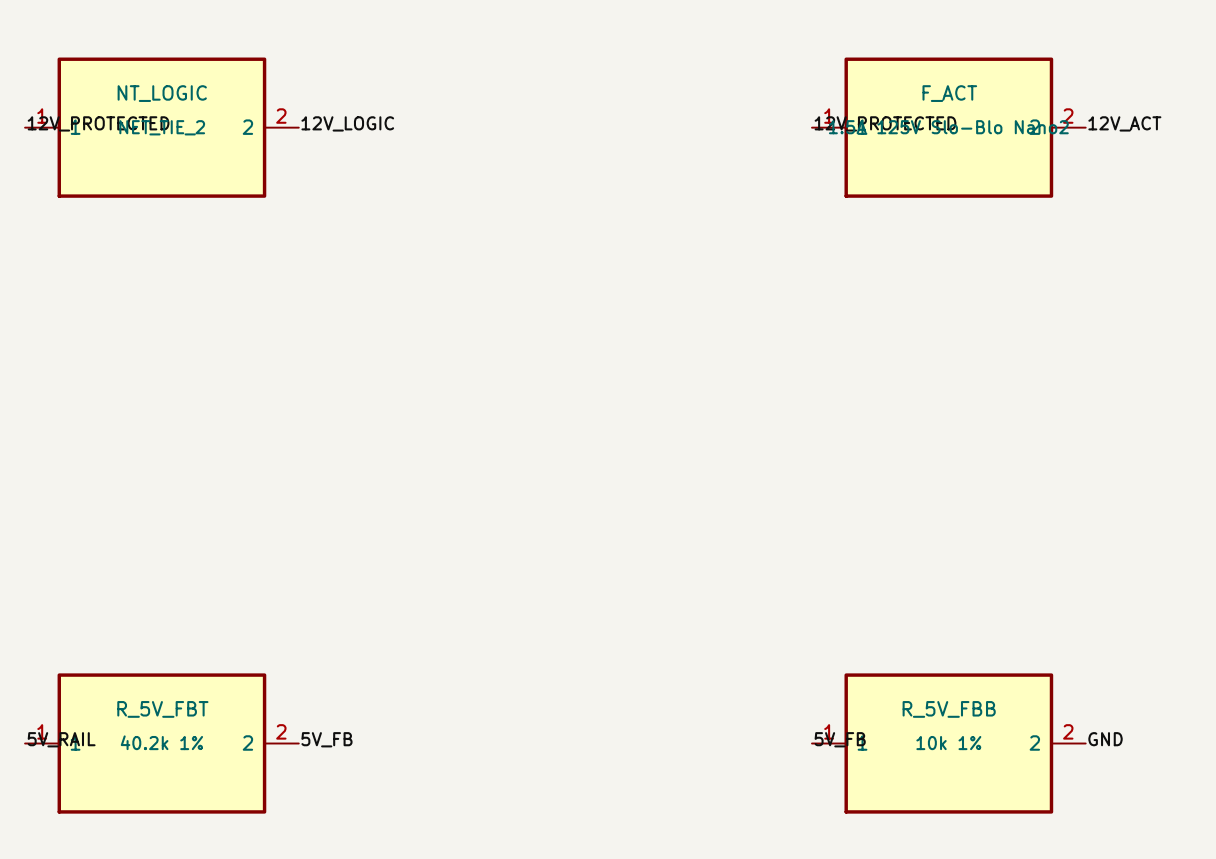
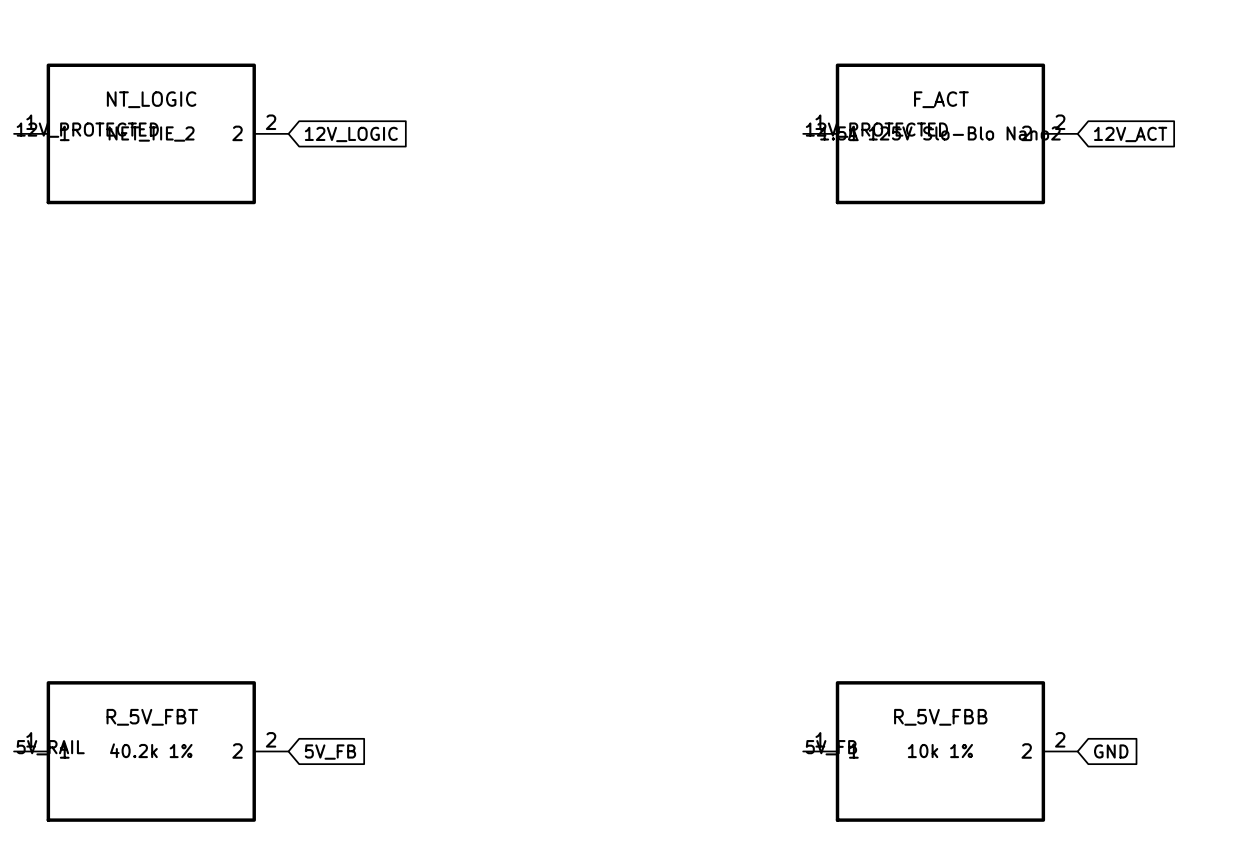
label: 12V_LOGIC (347, 123) -> none
label: 12V_ACT (1124, 123) -> none
global label: none -> 12V_LOGIC (351, 134)
global label: none -> 12V_ACT (1130, 134)
label: 5V_FB (326, 739) -> none
label: GND (1105, 739) -> none
global label: none -> GND (1111, 751)
global label: none -> 5V_FB (330, 752)

